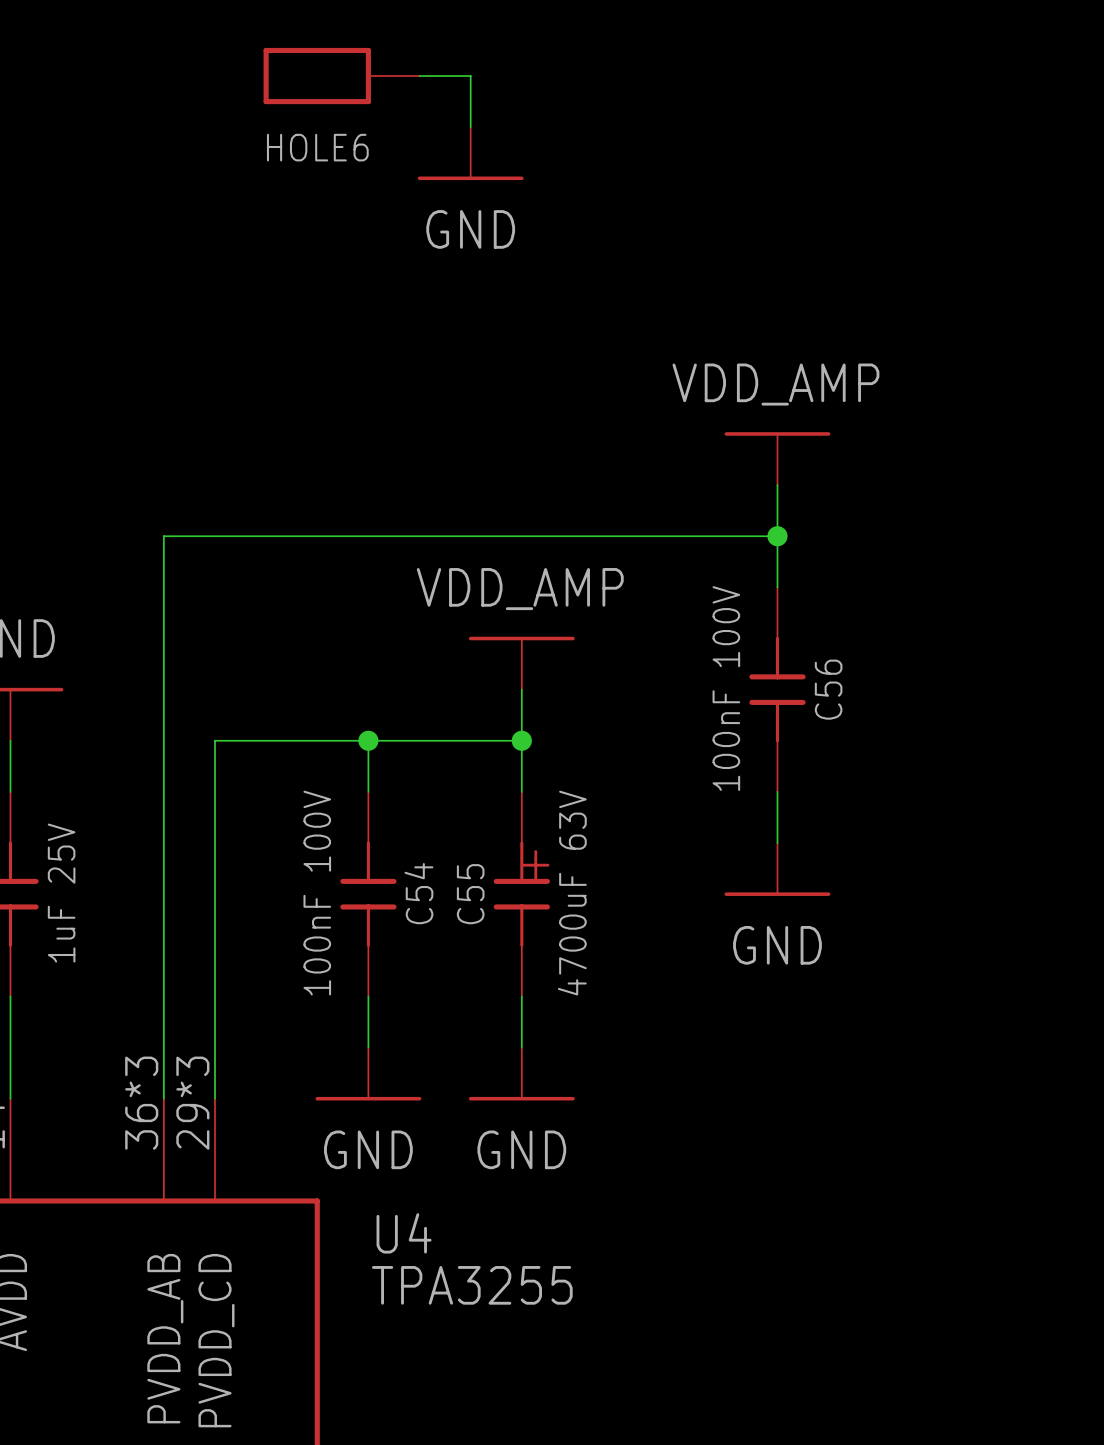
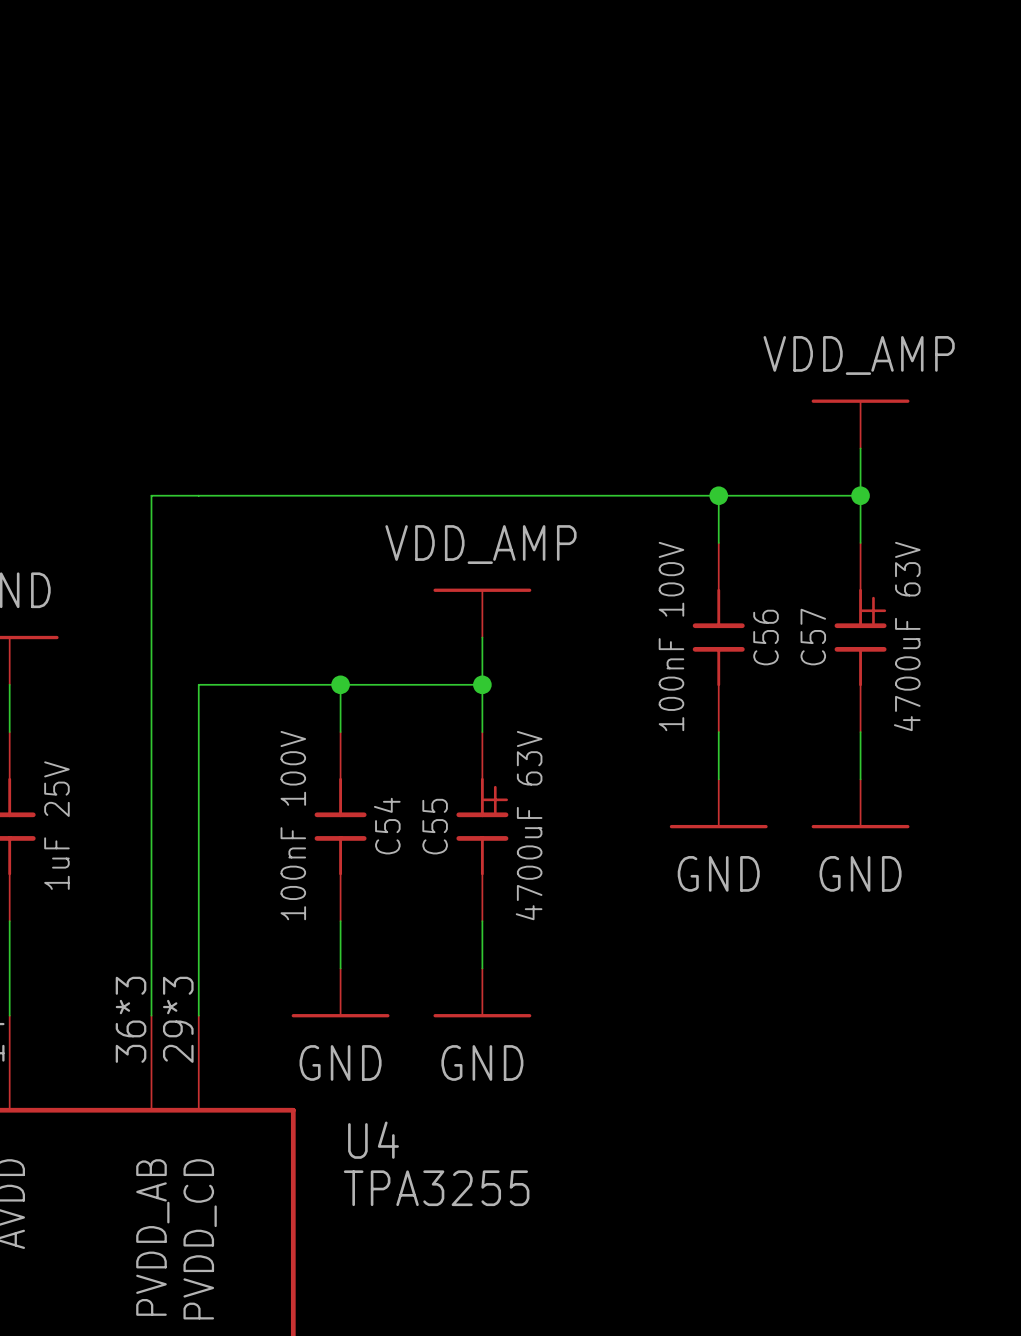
HOLE6: (341, 76) -> none
wire: (419, 76) (470, 76) (470, 127) -> none
power symbol: GND (470, 153) -> none
power symbol position: VDD_AMP (777, 458) -> VDD_AMP (860, 423)
wire: (777, 485) (777, 536) -> (860, 495) (718, 495)
wire: none -> (860, 448) (860, 542)
junction: none -> (860, 495)
C57: none -> 4700uF 63V (860, 637)
wire: none -> (860, 732) (860, 779)
power symbol: none -> GND (860, 803)

